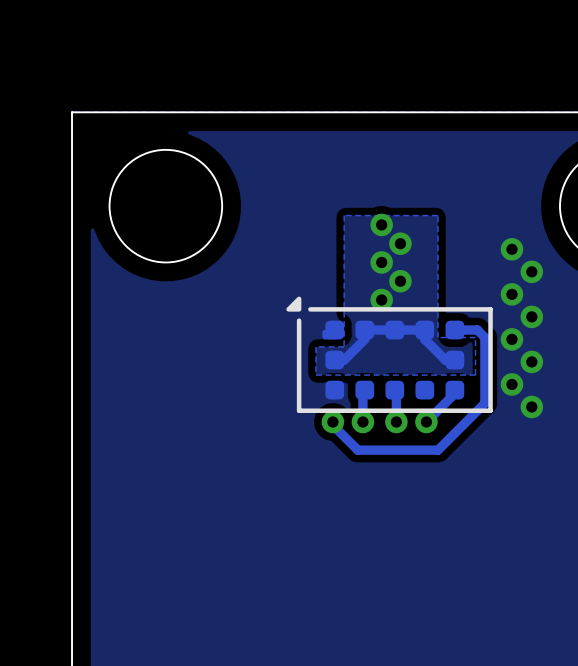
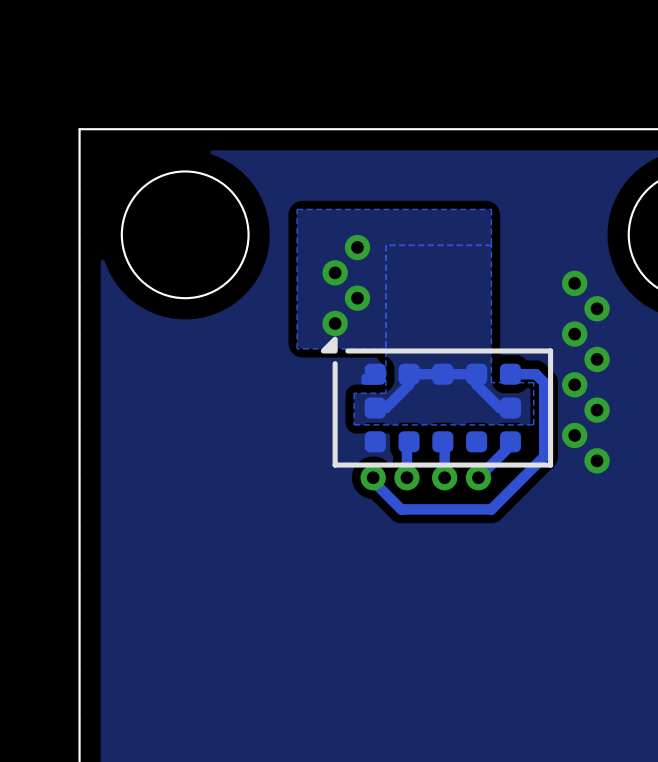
zone outline: none -> (491, 245) (491, 209) (297, 209) (297, 348) (385, 348)
via: none -> (357, 247)
via: (381, 224) -> none
via: none -> (335, 272)
via: (400, 243) -> none
via: none -> (357, 298)
via: (381, 262) -> none
via: (400, 281) -> none
via: none -> (335, 323)
via: (381, 300) -> none

